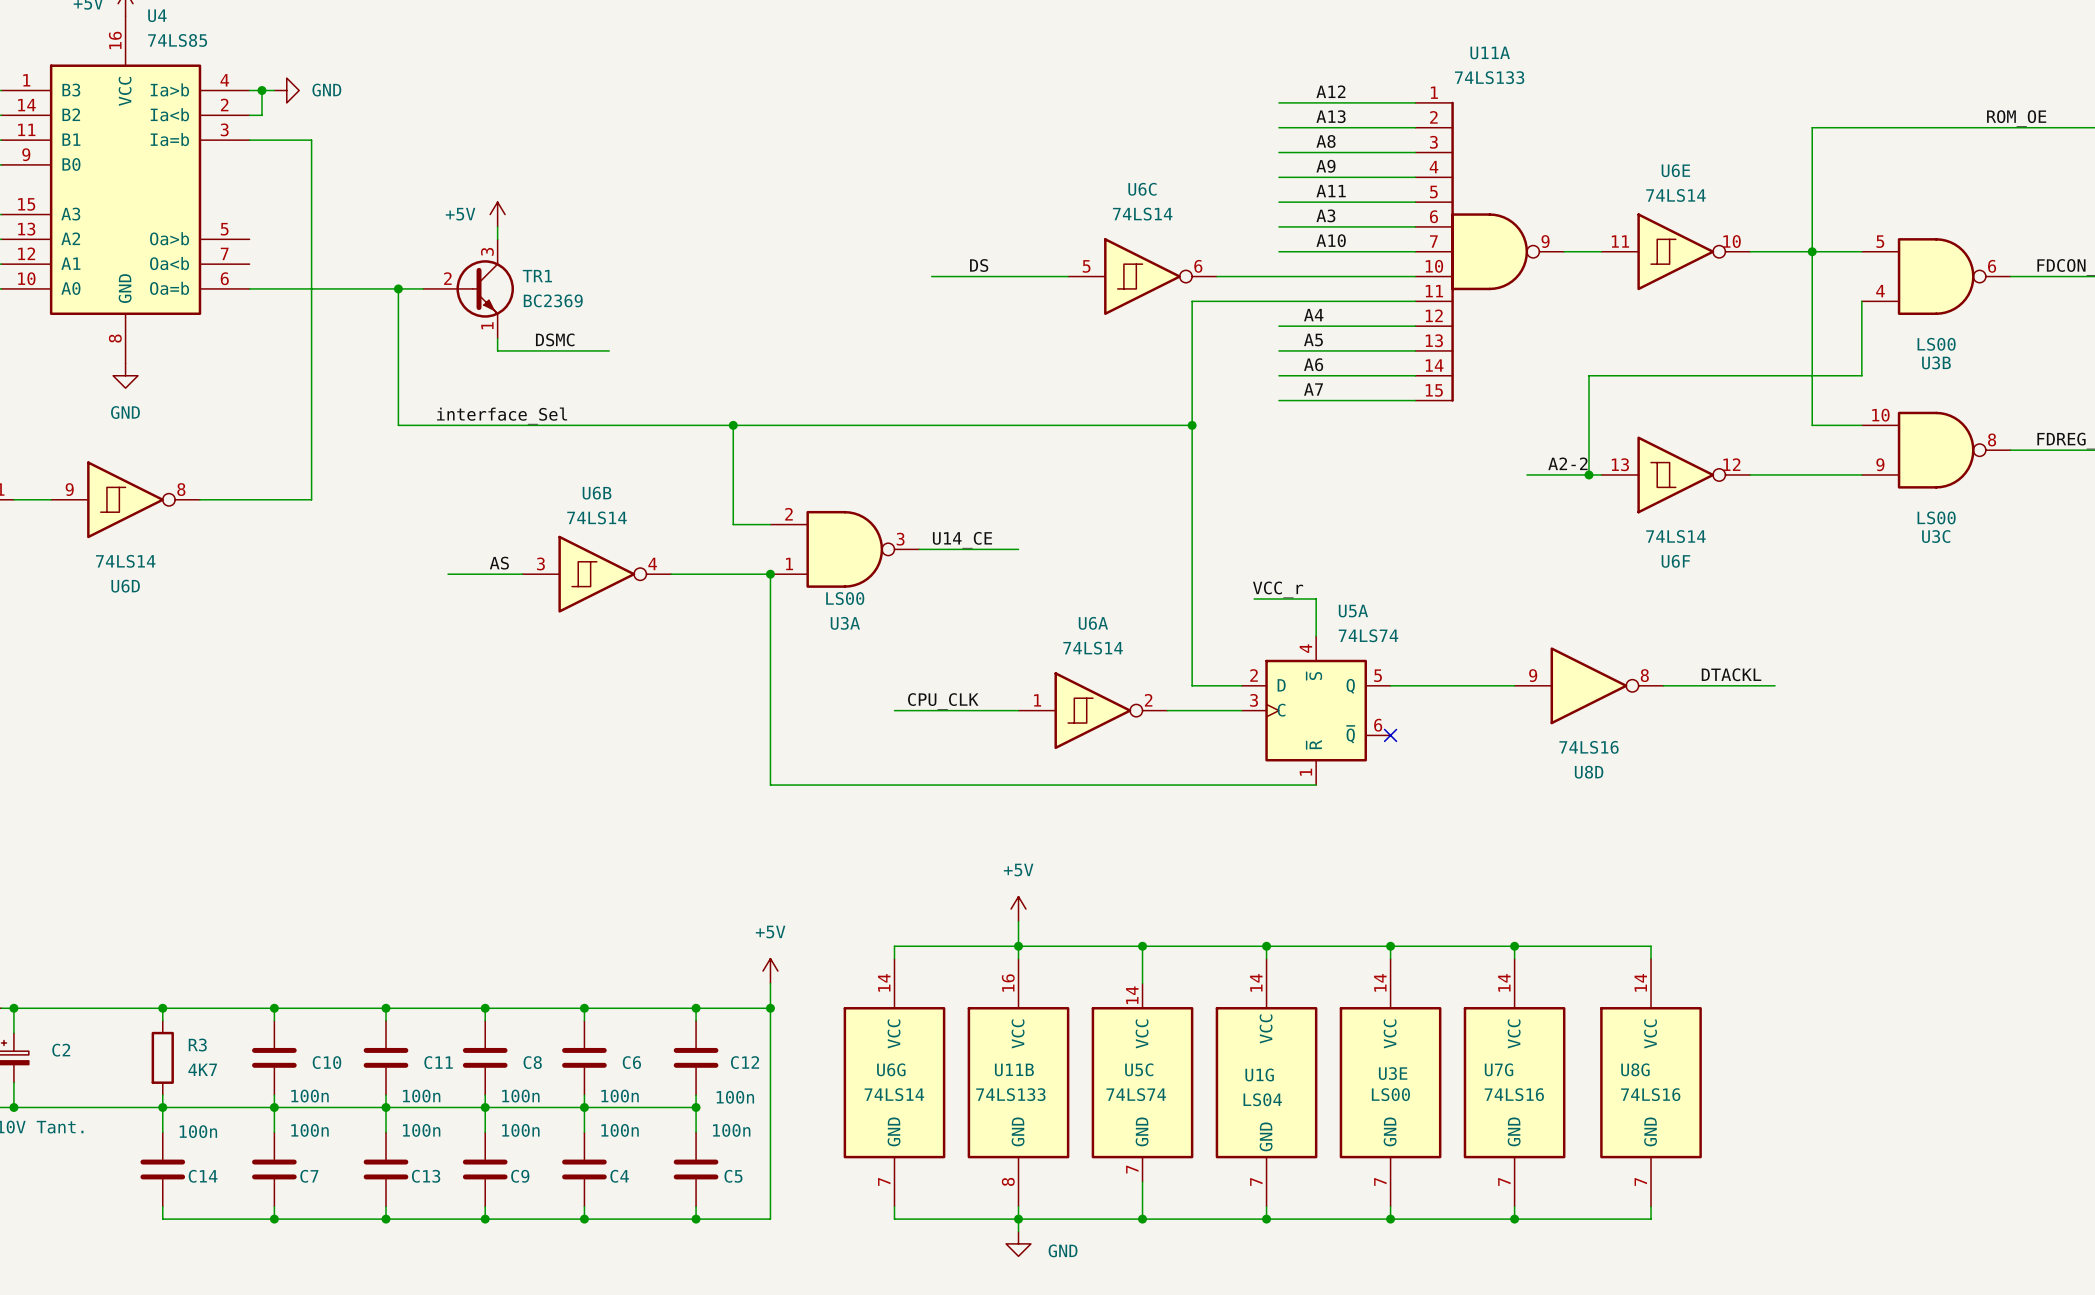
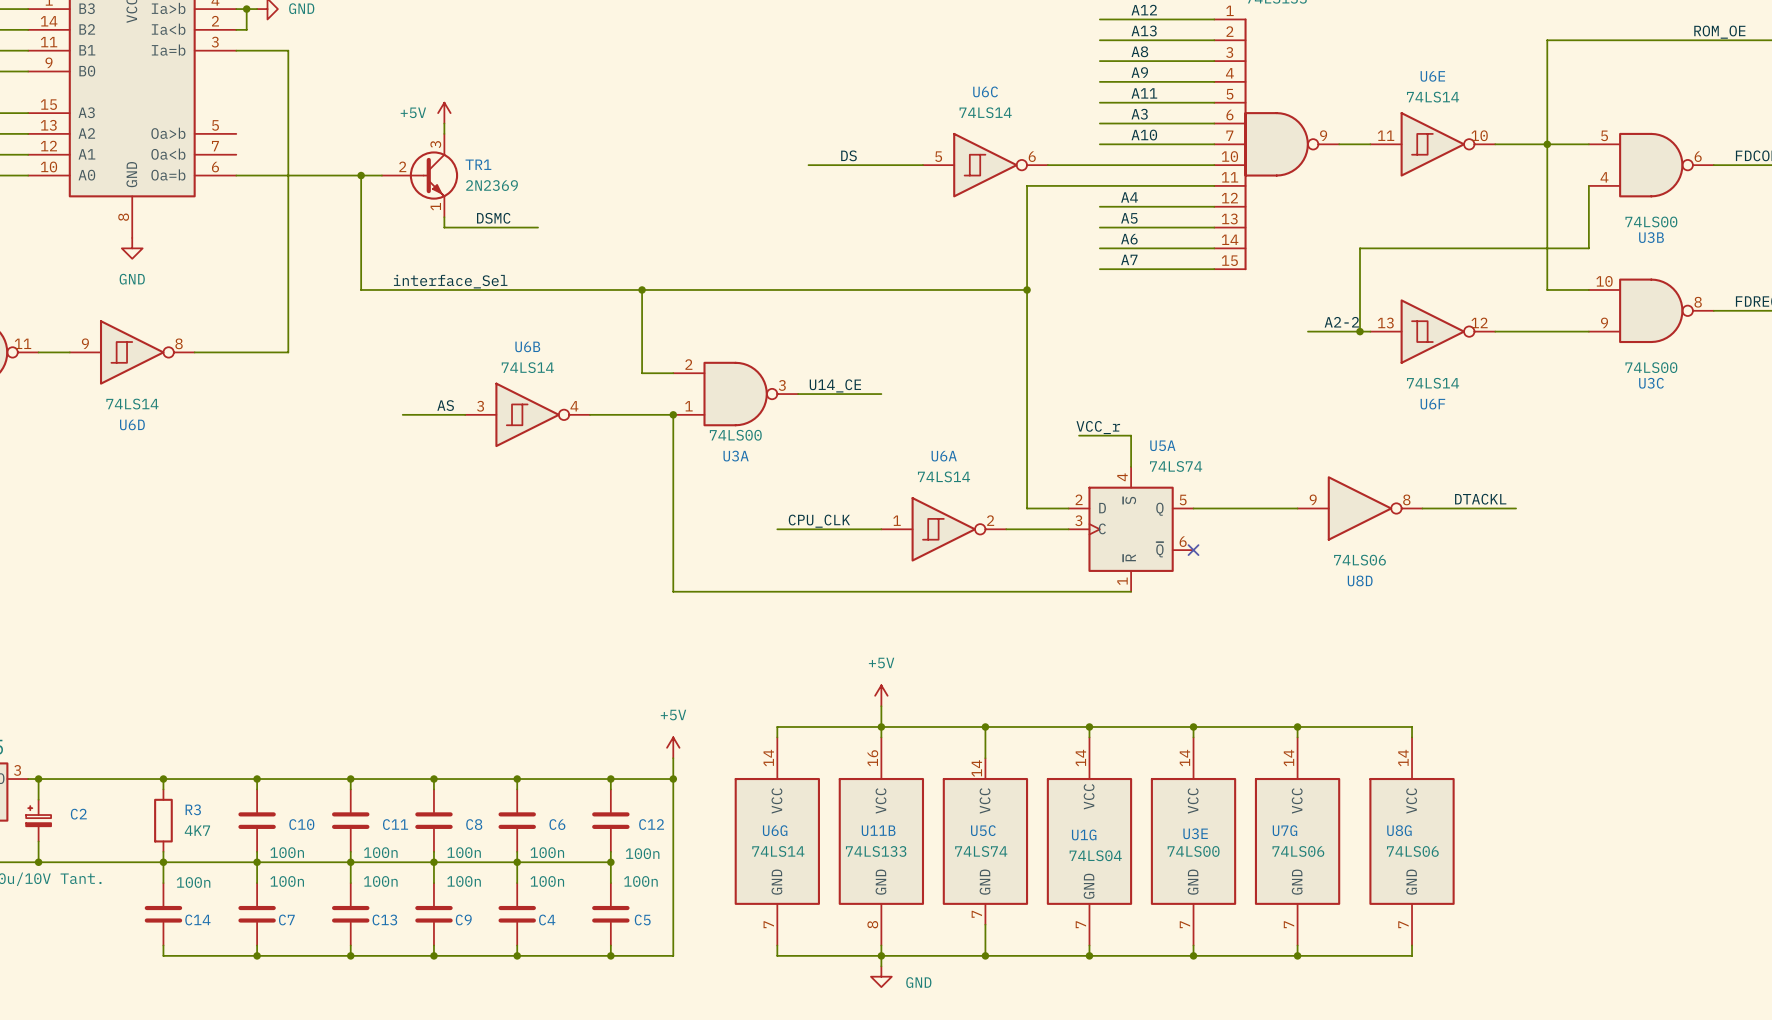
TR1 value: BC2369 (553, 300) -> 2N2369 (492, 185)
U3B value: LS00 (1936, 344) -> 74LS00 (1651, 221)
U3C value: LS00 (1936, 517) -> 74LS00 (1651, 367)
U3A value: LS00 (845, 598) -> 74LS00 (735, 435)
U8D value: 74LS16 (1589, 747) -> 74LS06 (1360, 560)
U3E value: LS00 (1390, 1094) -> 74LS00 (1193, 851)
U7G value: 74LS16 (1514, 1094) -> 74LS06 (1298, 851)
U8G value: 74LS16 (1650, 1094) -> 74LS06 (1412, 851)
U1G value: LS04 (1262, 1099) -> 74LS04 (1095, 855)

